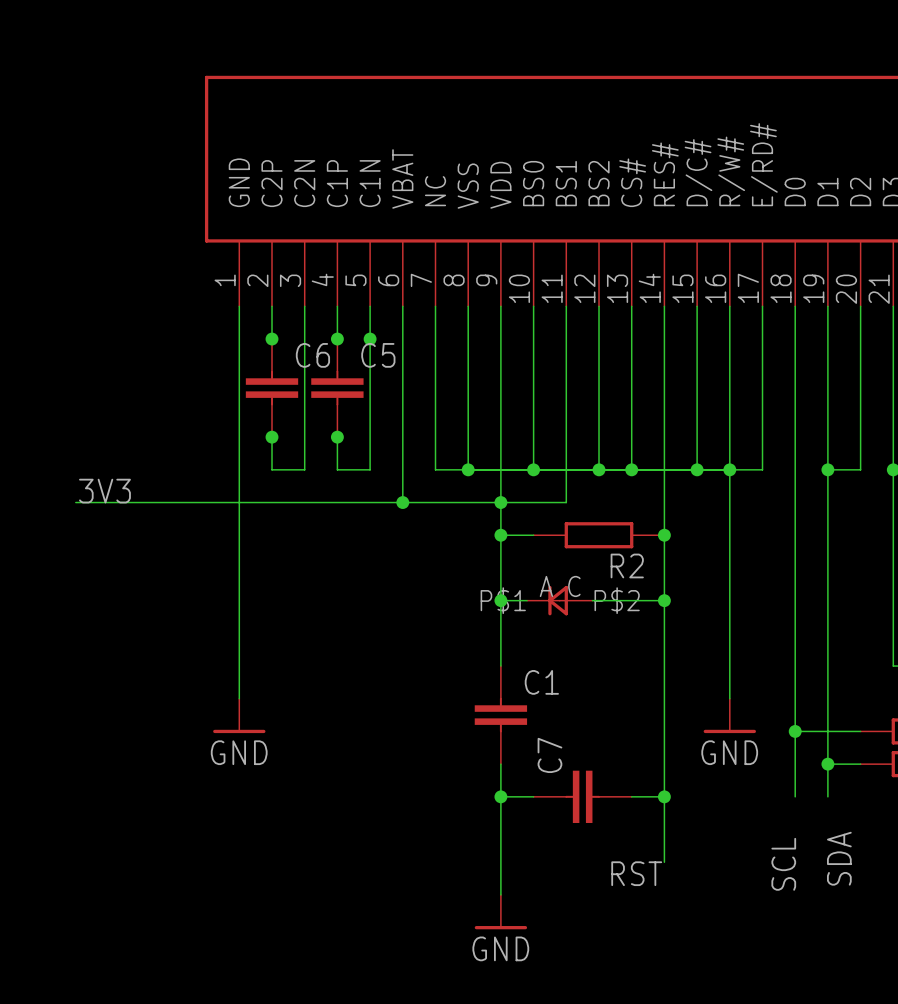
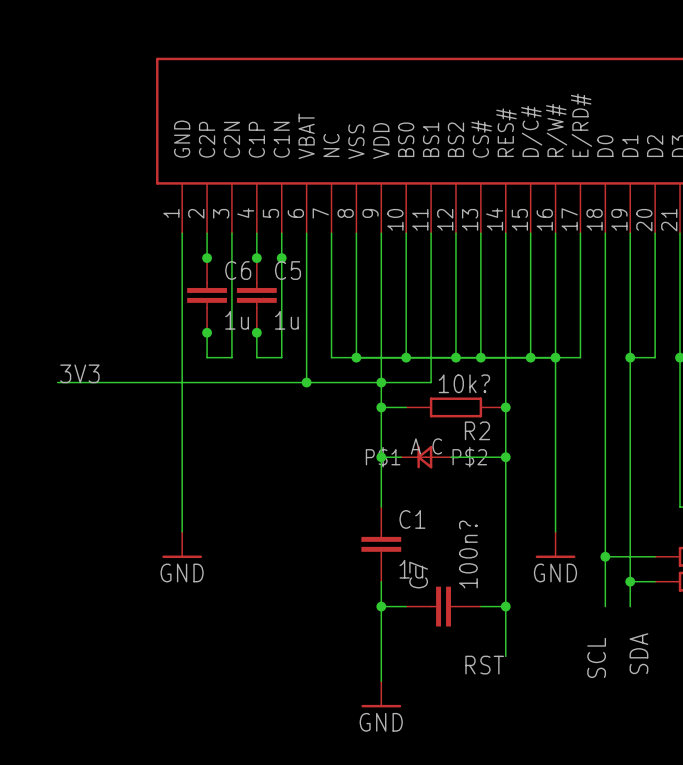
C6 value: none -> 1u (237, 320)
C5 value: none -> 1u (286, 320)
R2 value: none -> 10k? (464, 383)
C7 value: none -> 100n? (468, 554)
C1 value: none -> 1u (411, 569)

